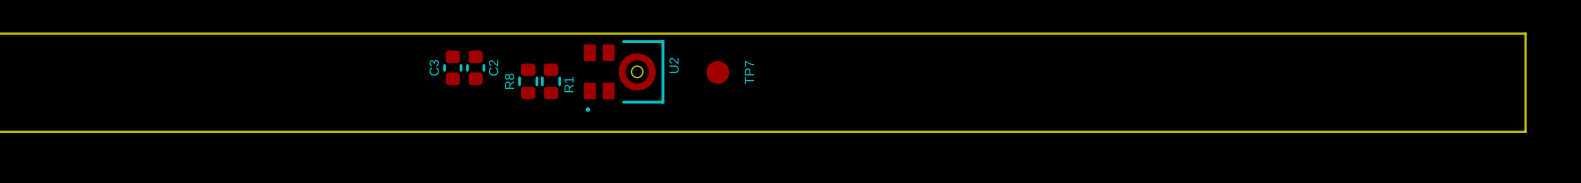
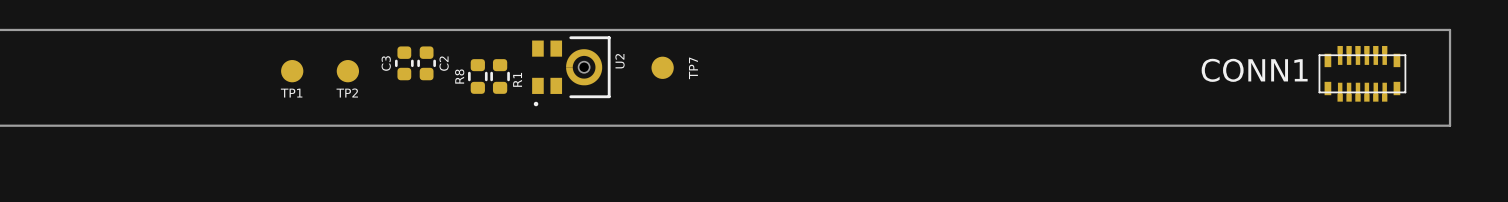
TP1: none -> (292, 71)
TP2: none -> (347, 71)
CONN1: none -> (1362, 73)

